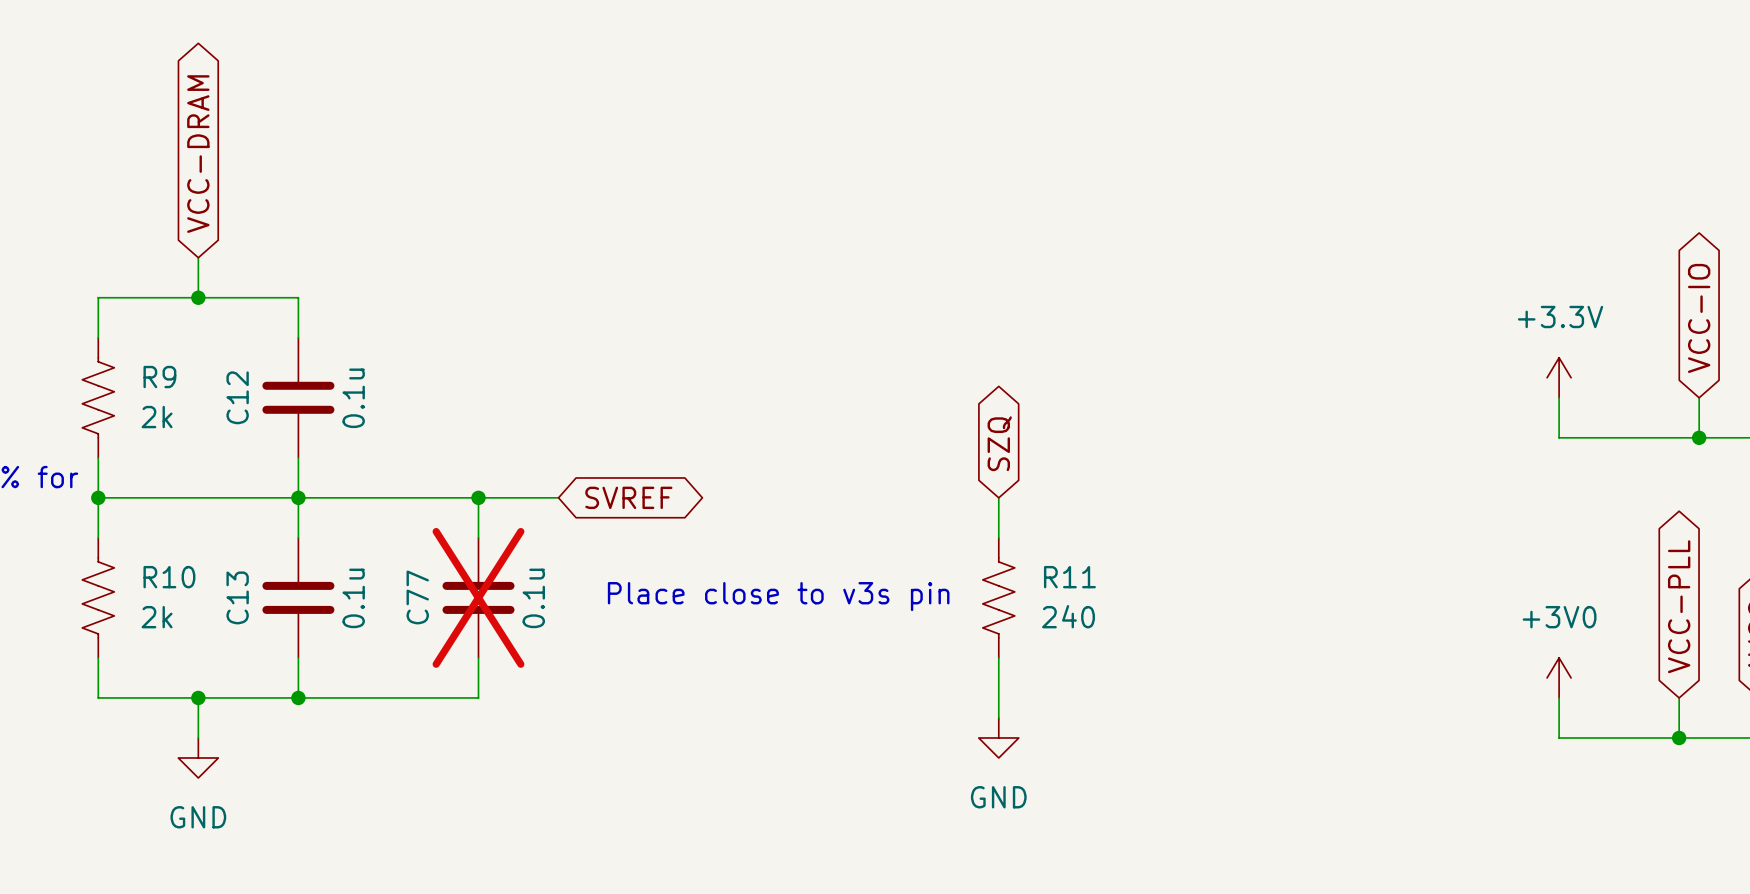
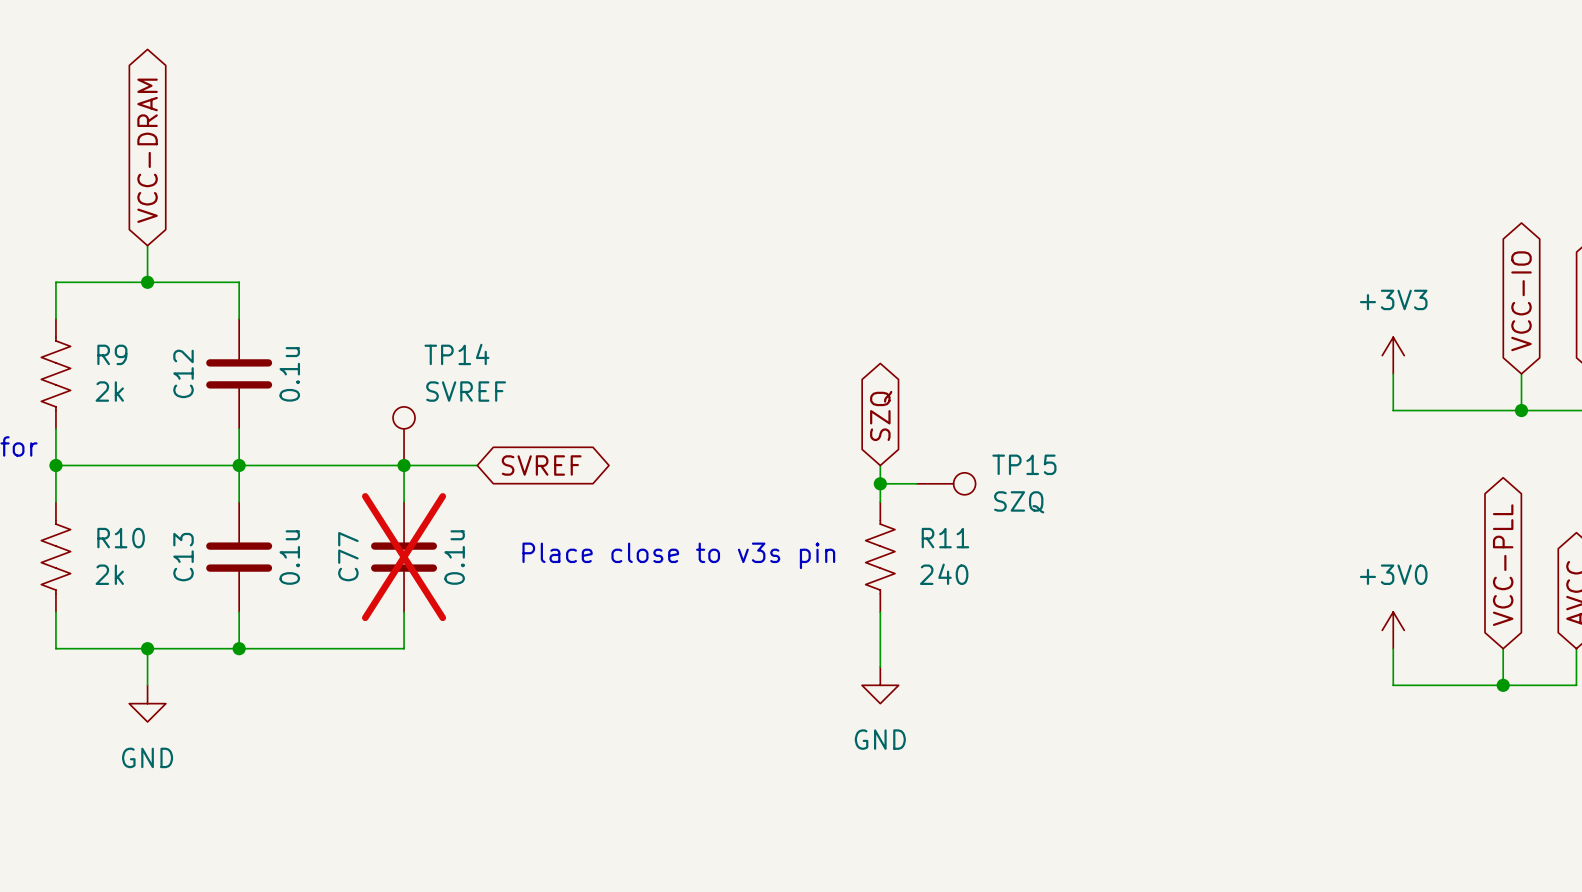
power symbol: +3.3V (1559, 377) -> +3V3 (1393, 355)
TP14: none -> SVREF (404, 436)
wire: none -> (880, 483) (916, 483)
junction: none -> (880, 483)
TP15: none -> SZQ (946, 483)

